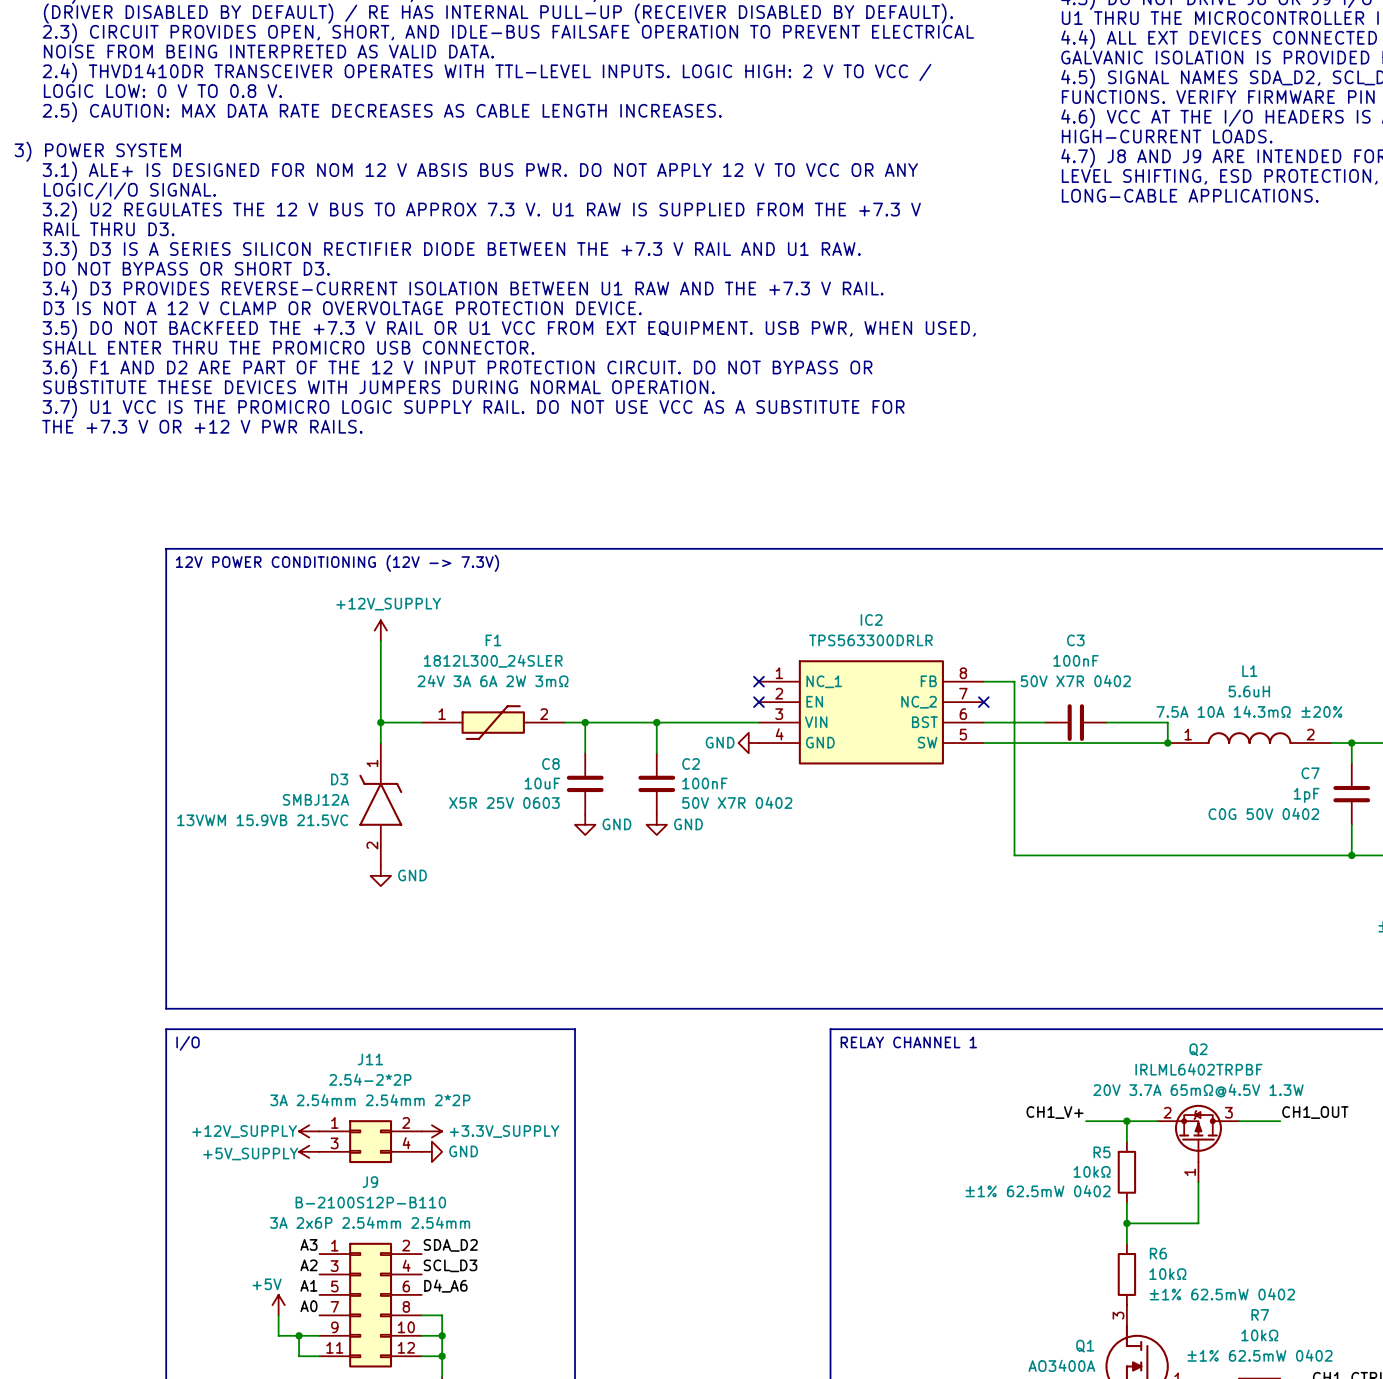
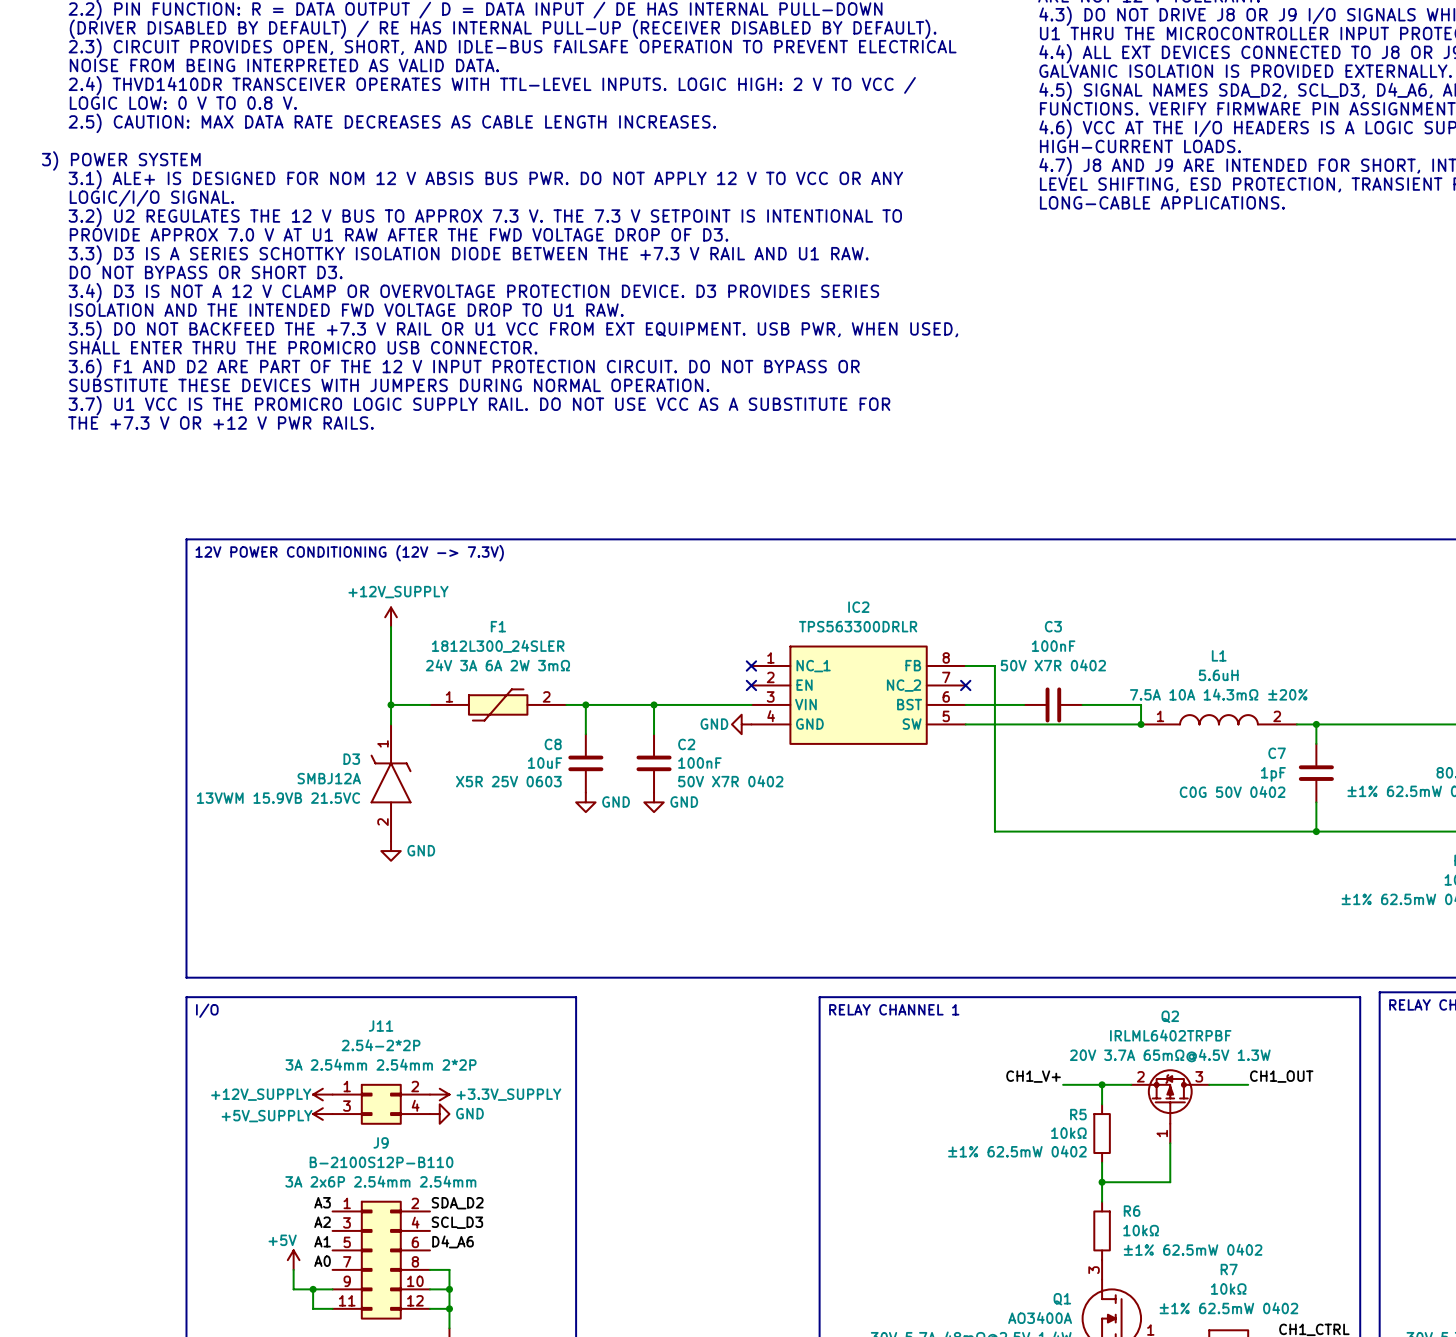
text: 3.2) U2 REGULATES THE 12 V BUS TO APPROX 7.3 V. U1 RAW IS SUPPLIED FROM THE +7.3 V (481, 211) -> 3.2) U2 REGULATES THE 12 V BUS TO APPROX 7.3 V. THE 7.3 V SETPOINT IS INTENTIONAL TO (485, 217)
text: RAIL THRU D3. (109, 229) -> PROVIDE APPROX 7.0 V AT U1 RAW AFTER THE FWD VOLTAGE DROP OF D3. (399, 234)
text: 3.3) D3 IS A SERIES SILICON RECTIFIER DIODE BETWEEN THE +7.3 V RAIL AND U1 RAW. (451, 250) -> 3.3) D3 IS A SERIES SCHOTTKY ISOLATION DIODE BETWEEN THE +7.3 V RAIL AND U1 RAW. (468, 255)
text: 3.4) D3 PROVIDES REVERSE-CURRENT ISOLATION BETWEEN U1 RAW AND THE +7.3 V RAIL. (463, 289) -> 3.4) D3 IS NOT A 12 V CLAMP OR OVERVOLTAGE PROTECTION DEVICE. D3 PROVIDES SERIES (473, 292)
text: D3 IS NOT A 12 V CLAMP OR OVERVOLTAGE PROTECTION DEVICE. (342, 308) -> ISOLATION AND THE INTENDED FWD VOLTAGE DROP TO U1 RAW. (346, 310)

